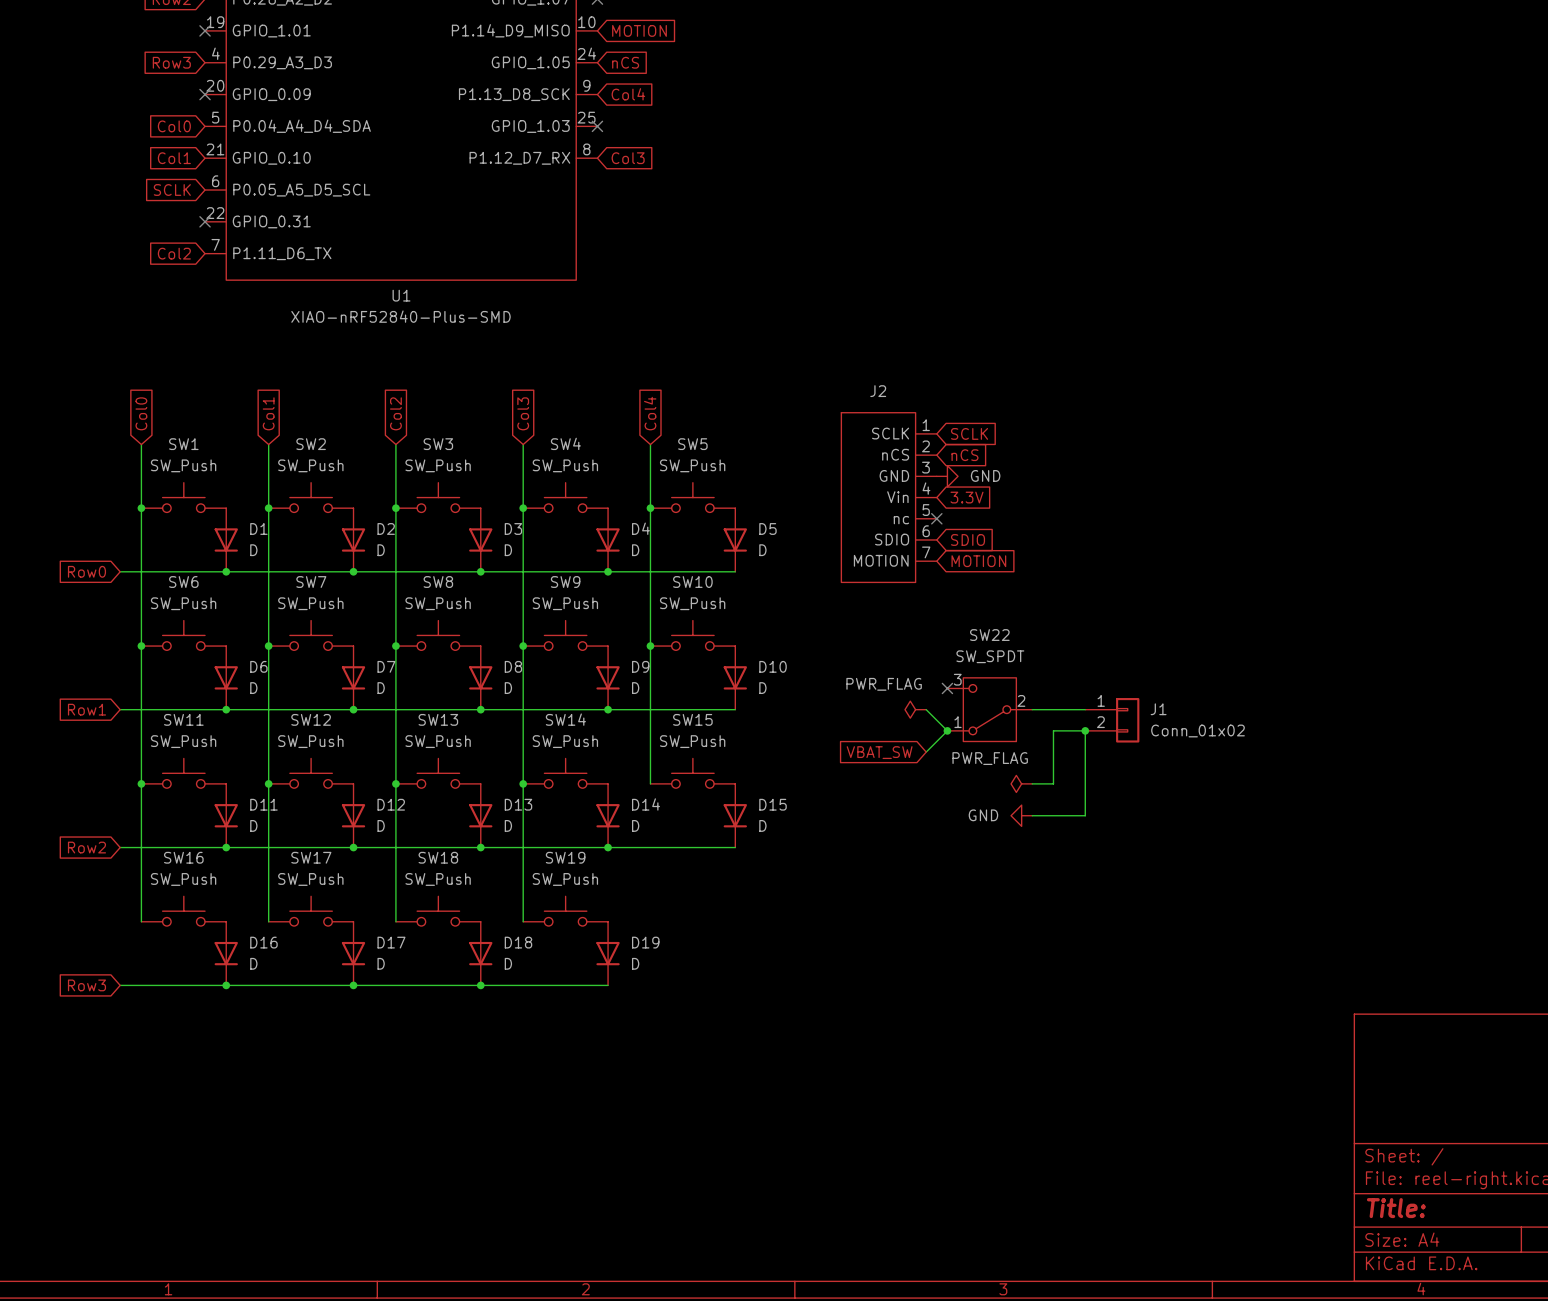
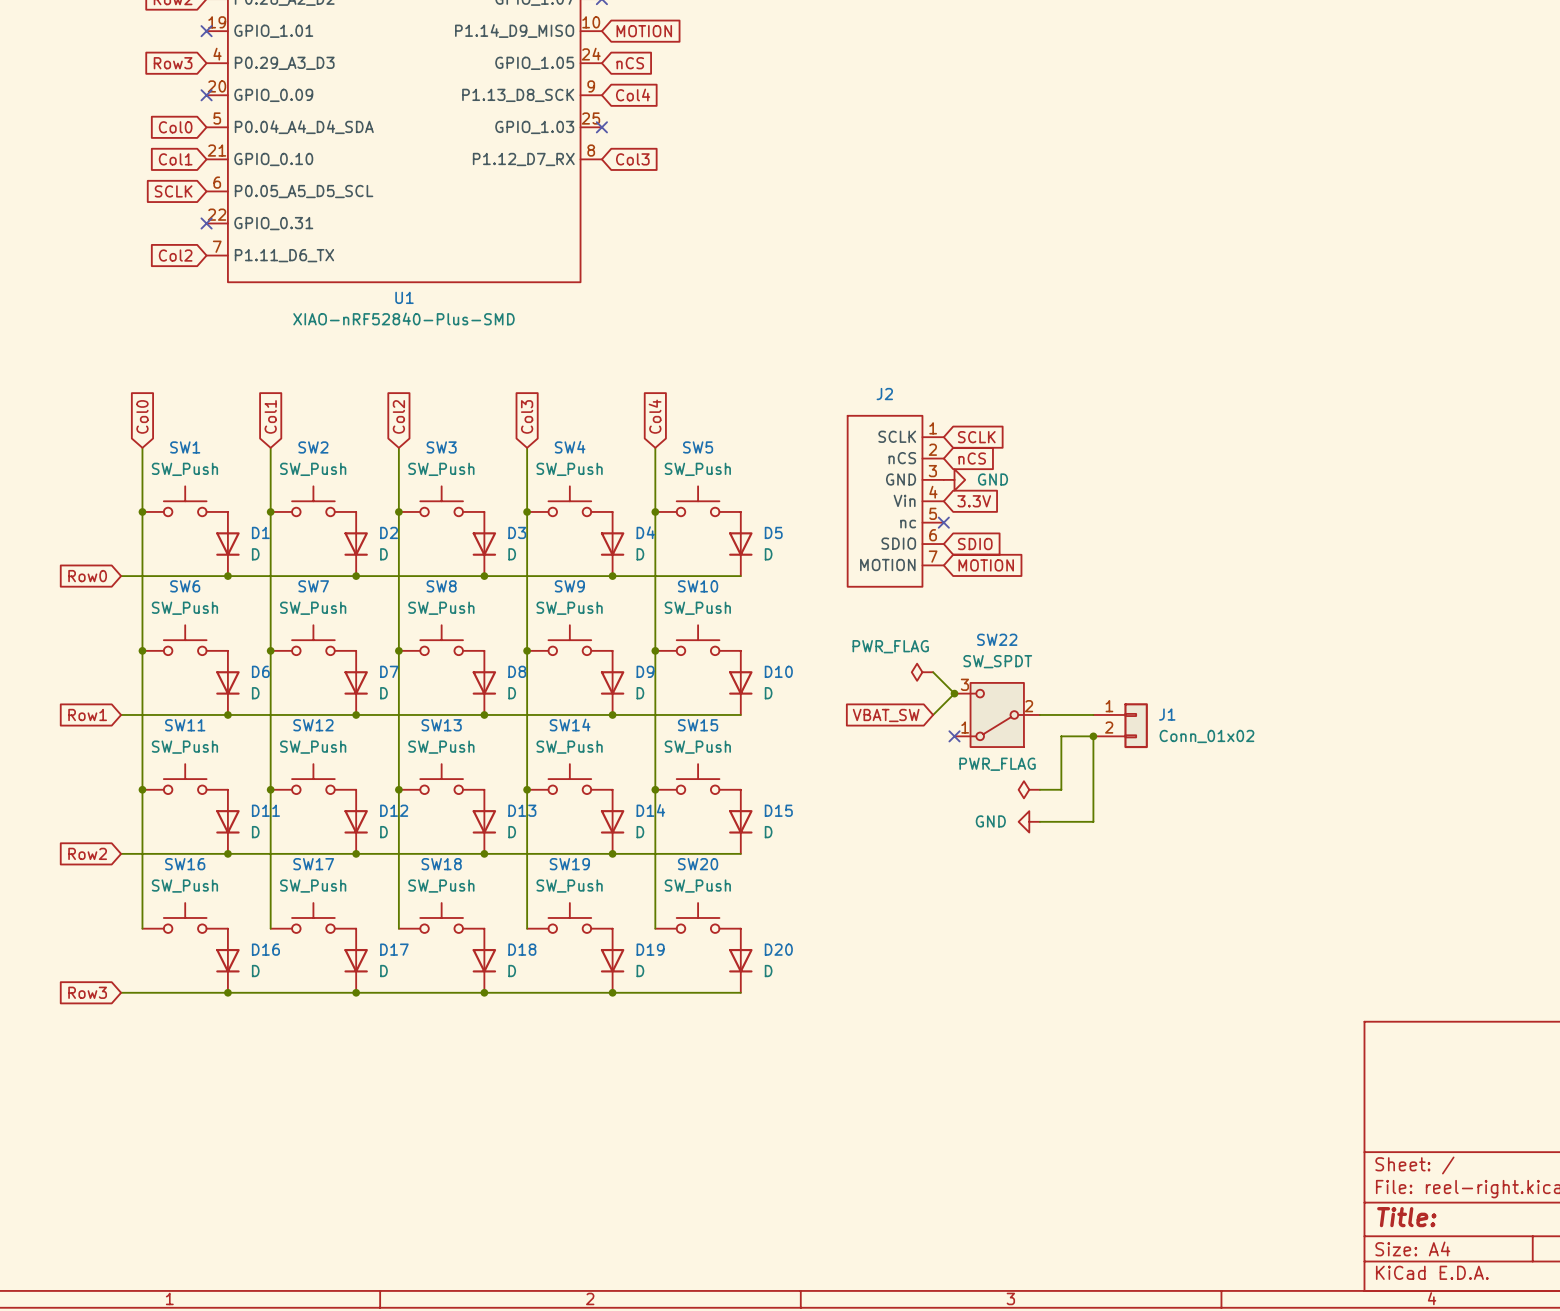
no-connect mark position: (947, 688) -> (954, 736)
power symbol position: PWR_FLAG (915, 709) -> PWR_FLAG (922, 672)
wire: (926, 709) (947, 730) (926, 752) -> (933, 714) (954, 693) (933, 672)
junction position: (947, 730) -> (954, 693)
global label position: VBAT_SW (879, 752) -> VBAT_SW (886, 715)
wire: none -> (655, 789) (655, 928)
junction: none -> (655, 789)
SW20: none -> SW_Push (698, 917)
D20: none -> D (740, 960)
wire: none -> (612, 992) (740, 992)
junction: none -> (612, 992)

